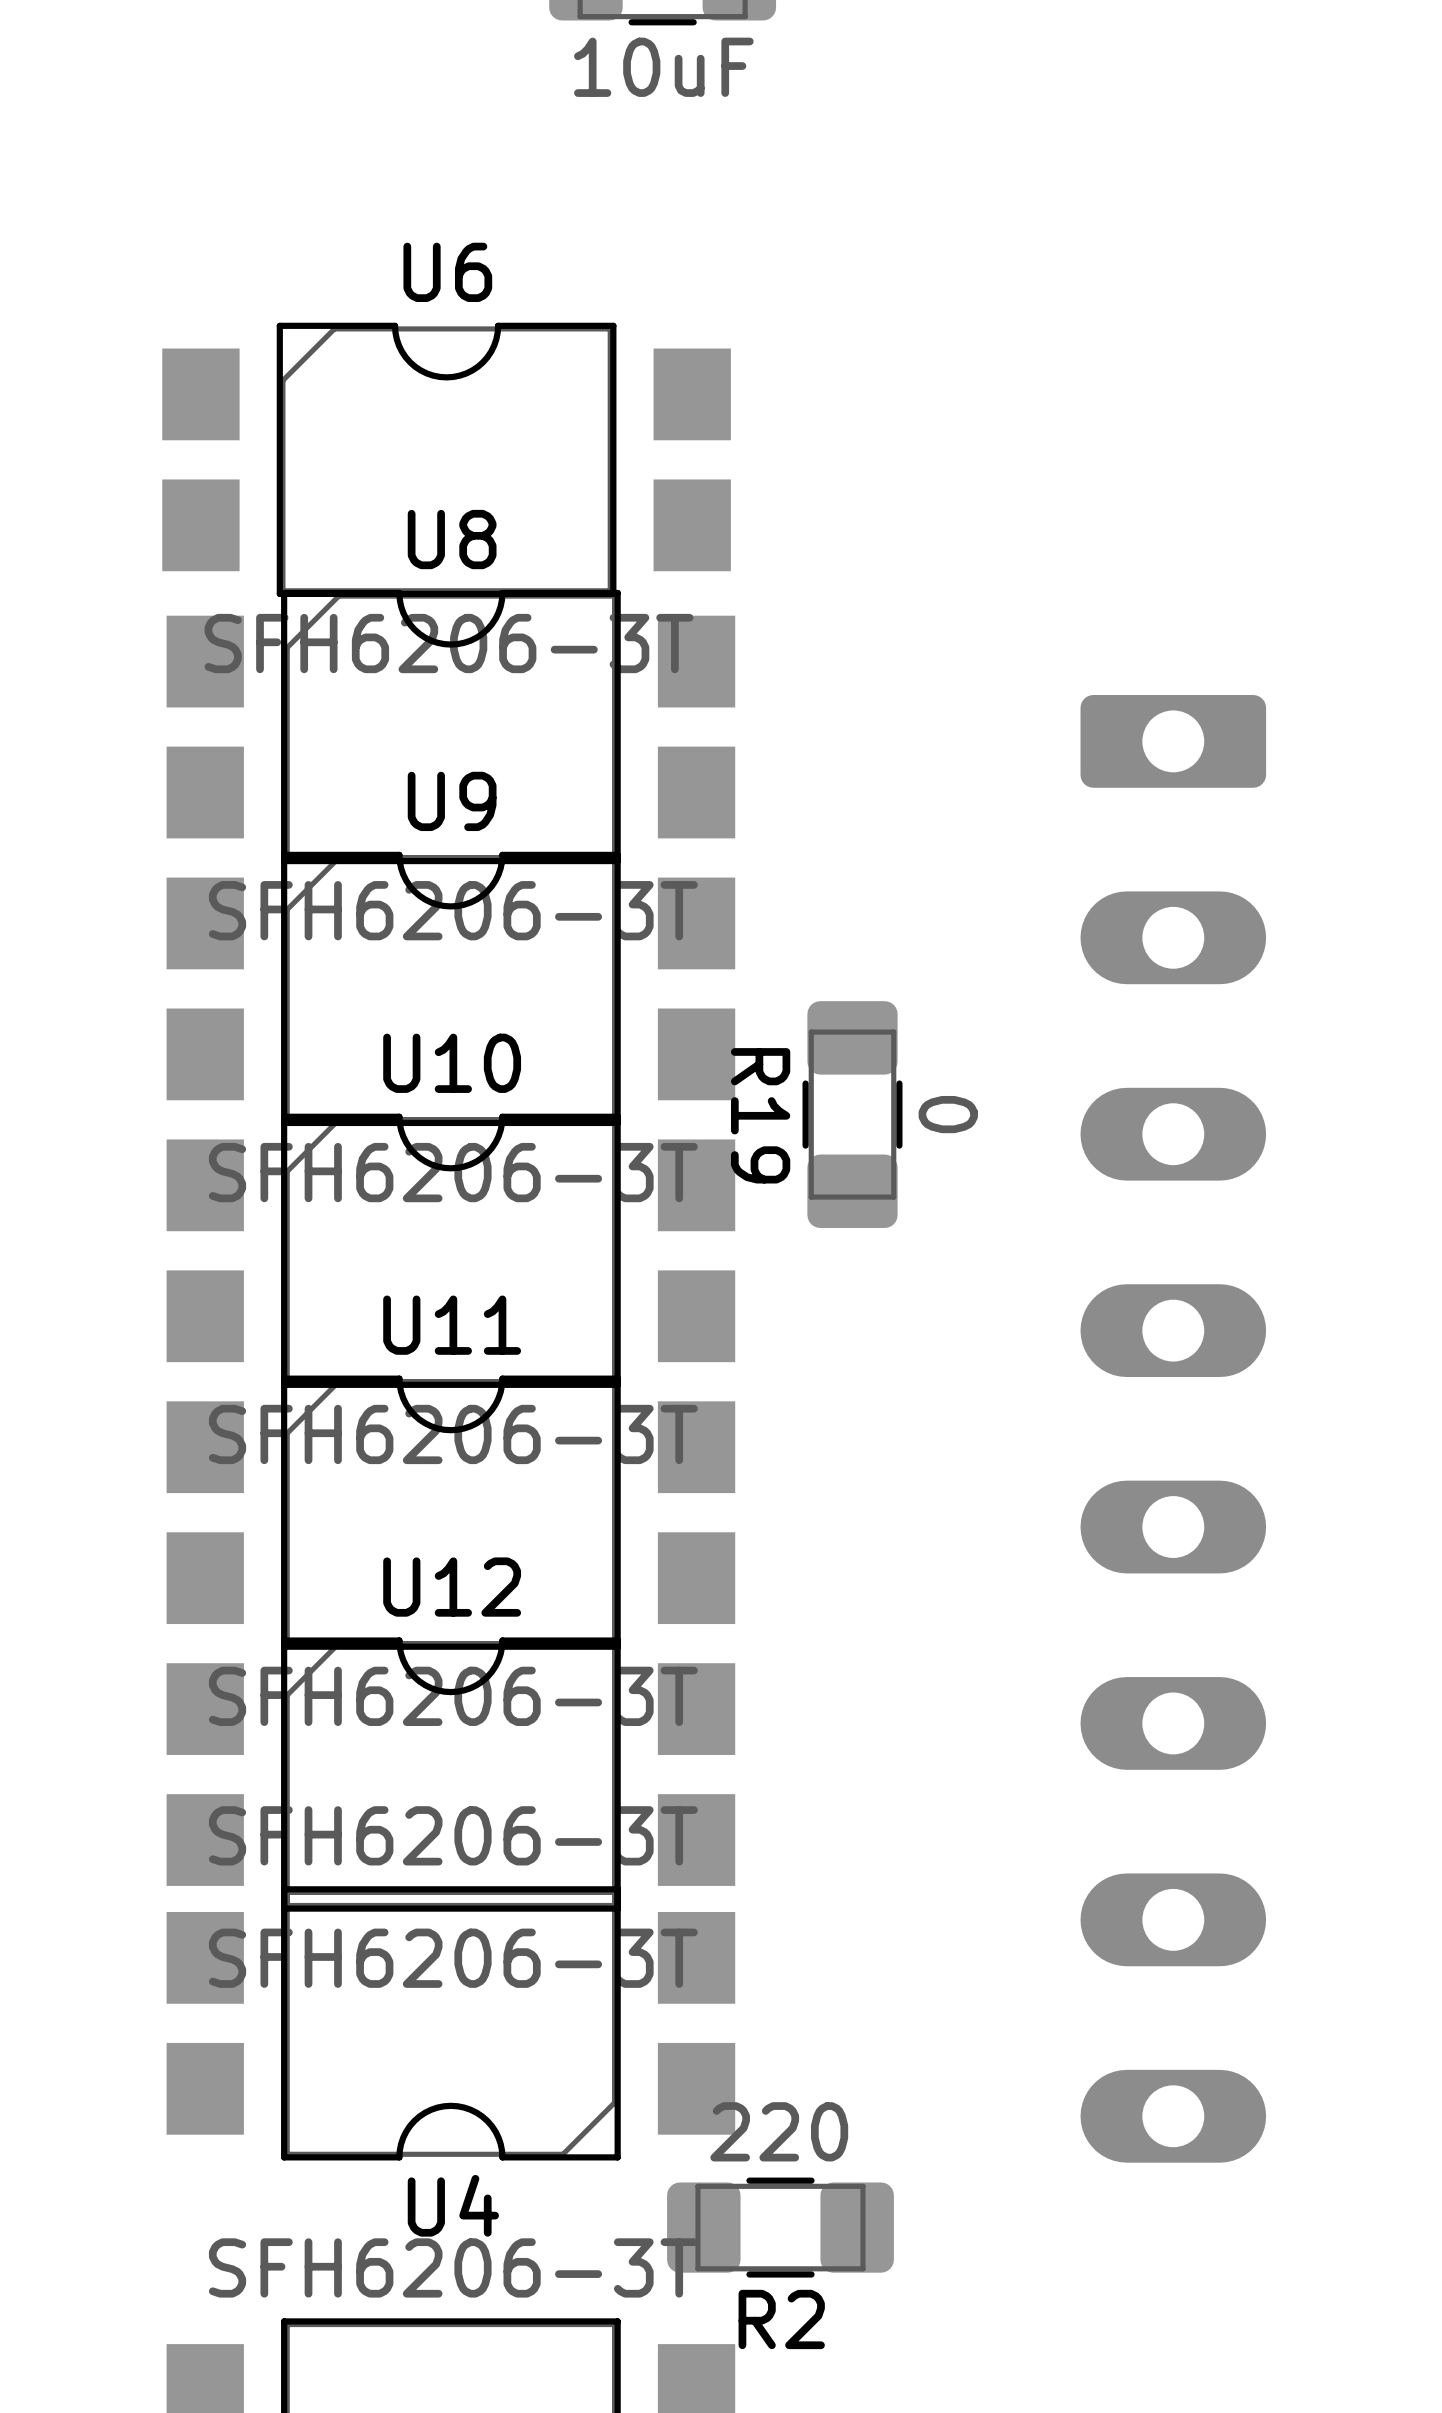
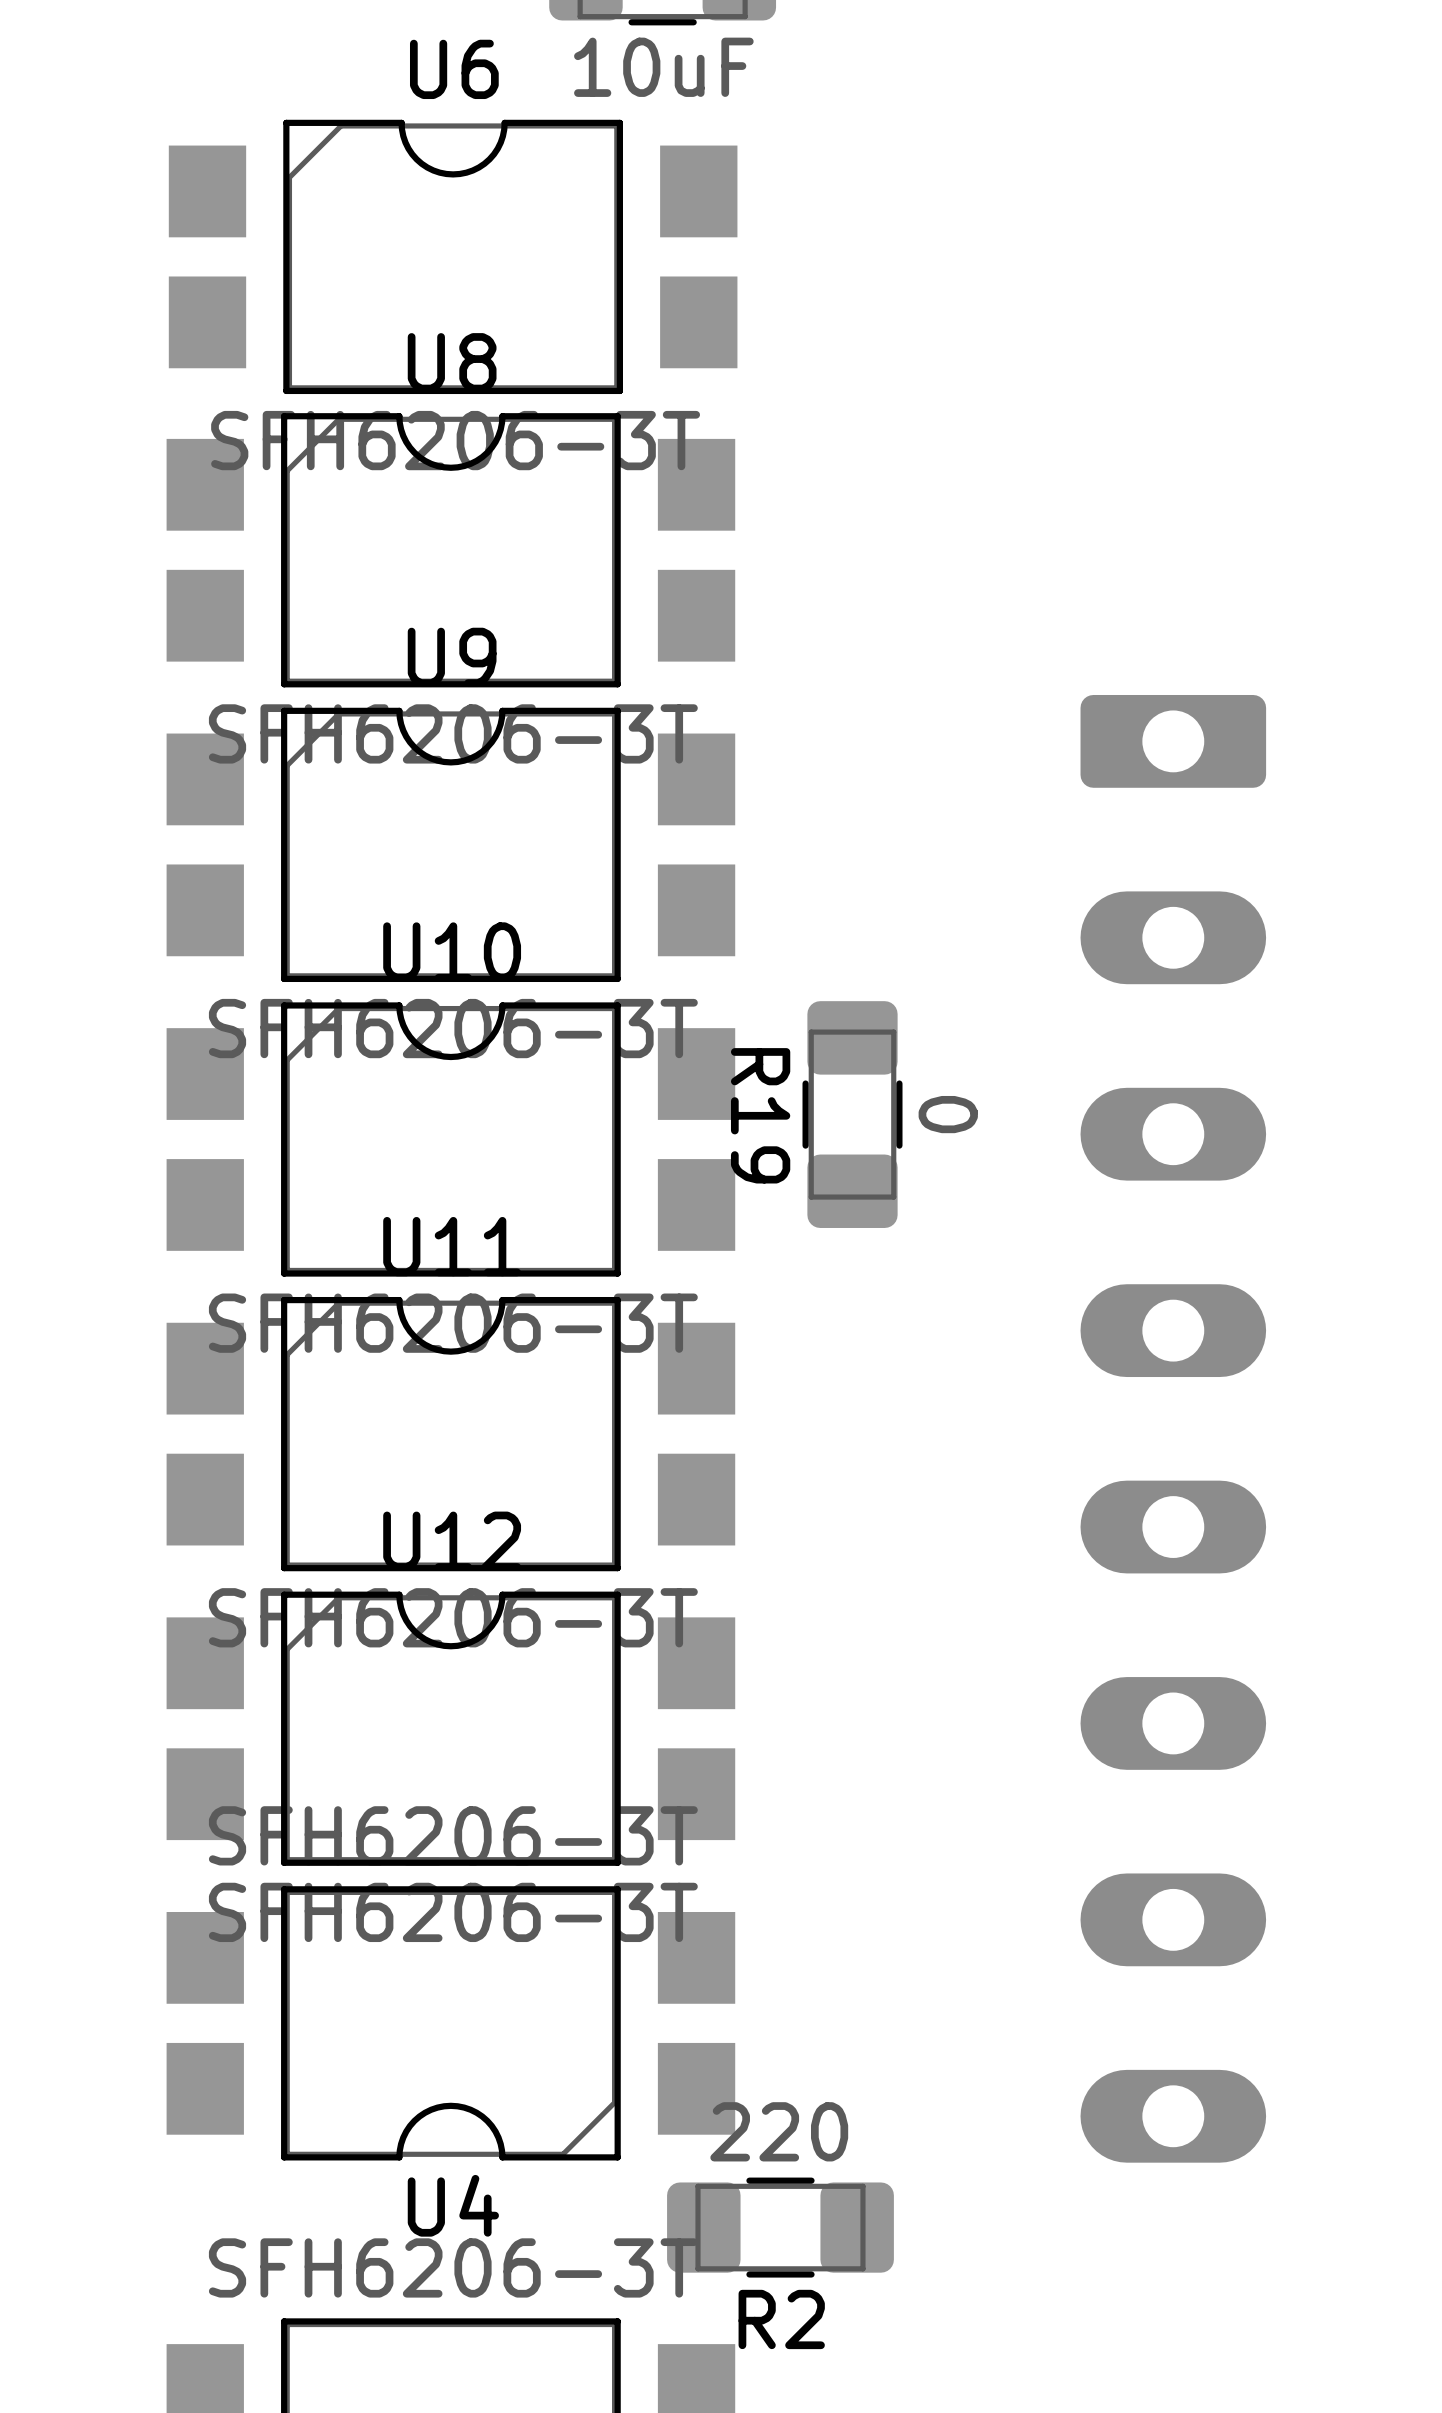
U6 position: (446, 459) -> (453, 256)
U8 position: (450, 727) -> (450, 550)
U9 position: (450, 988) -> (450, 844)
U10 position: (450, 1250) -> (450, 1139)
U11 position: (450, 1512) -> (450, 1434)
U12 position: (450, 1774) -> (450, 1728)

